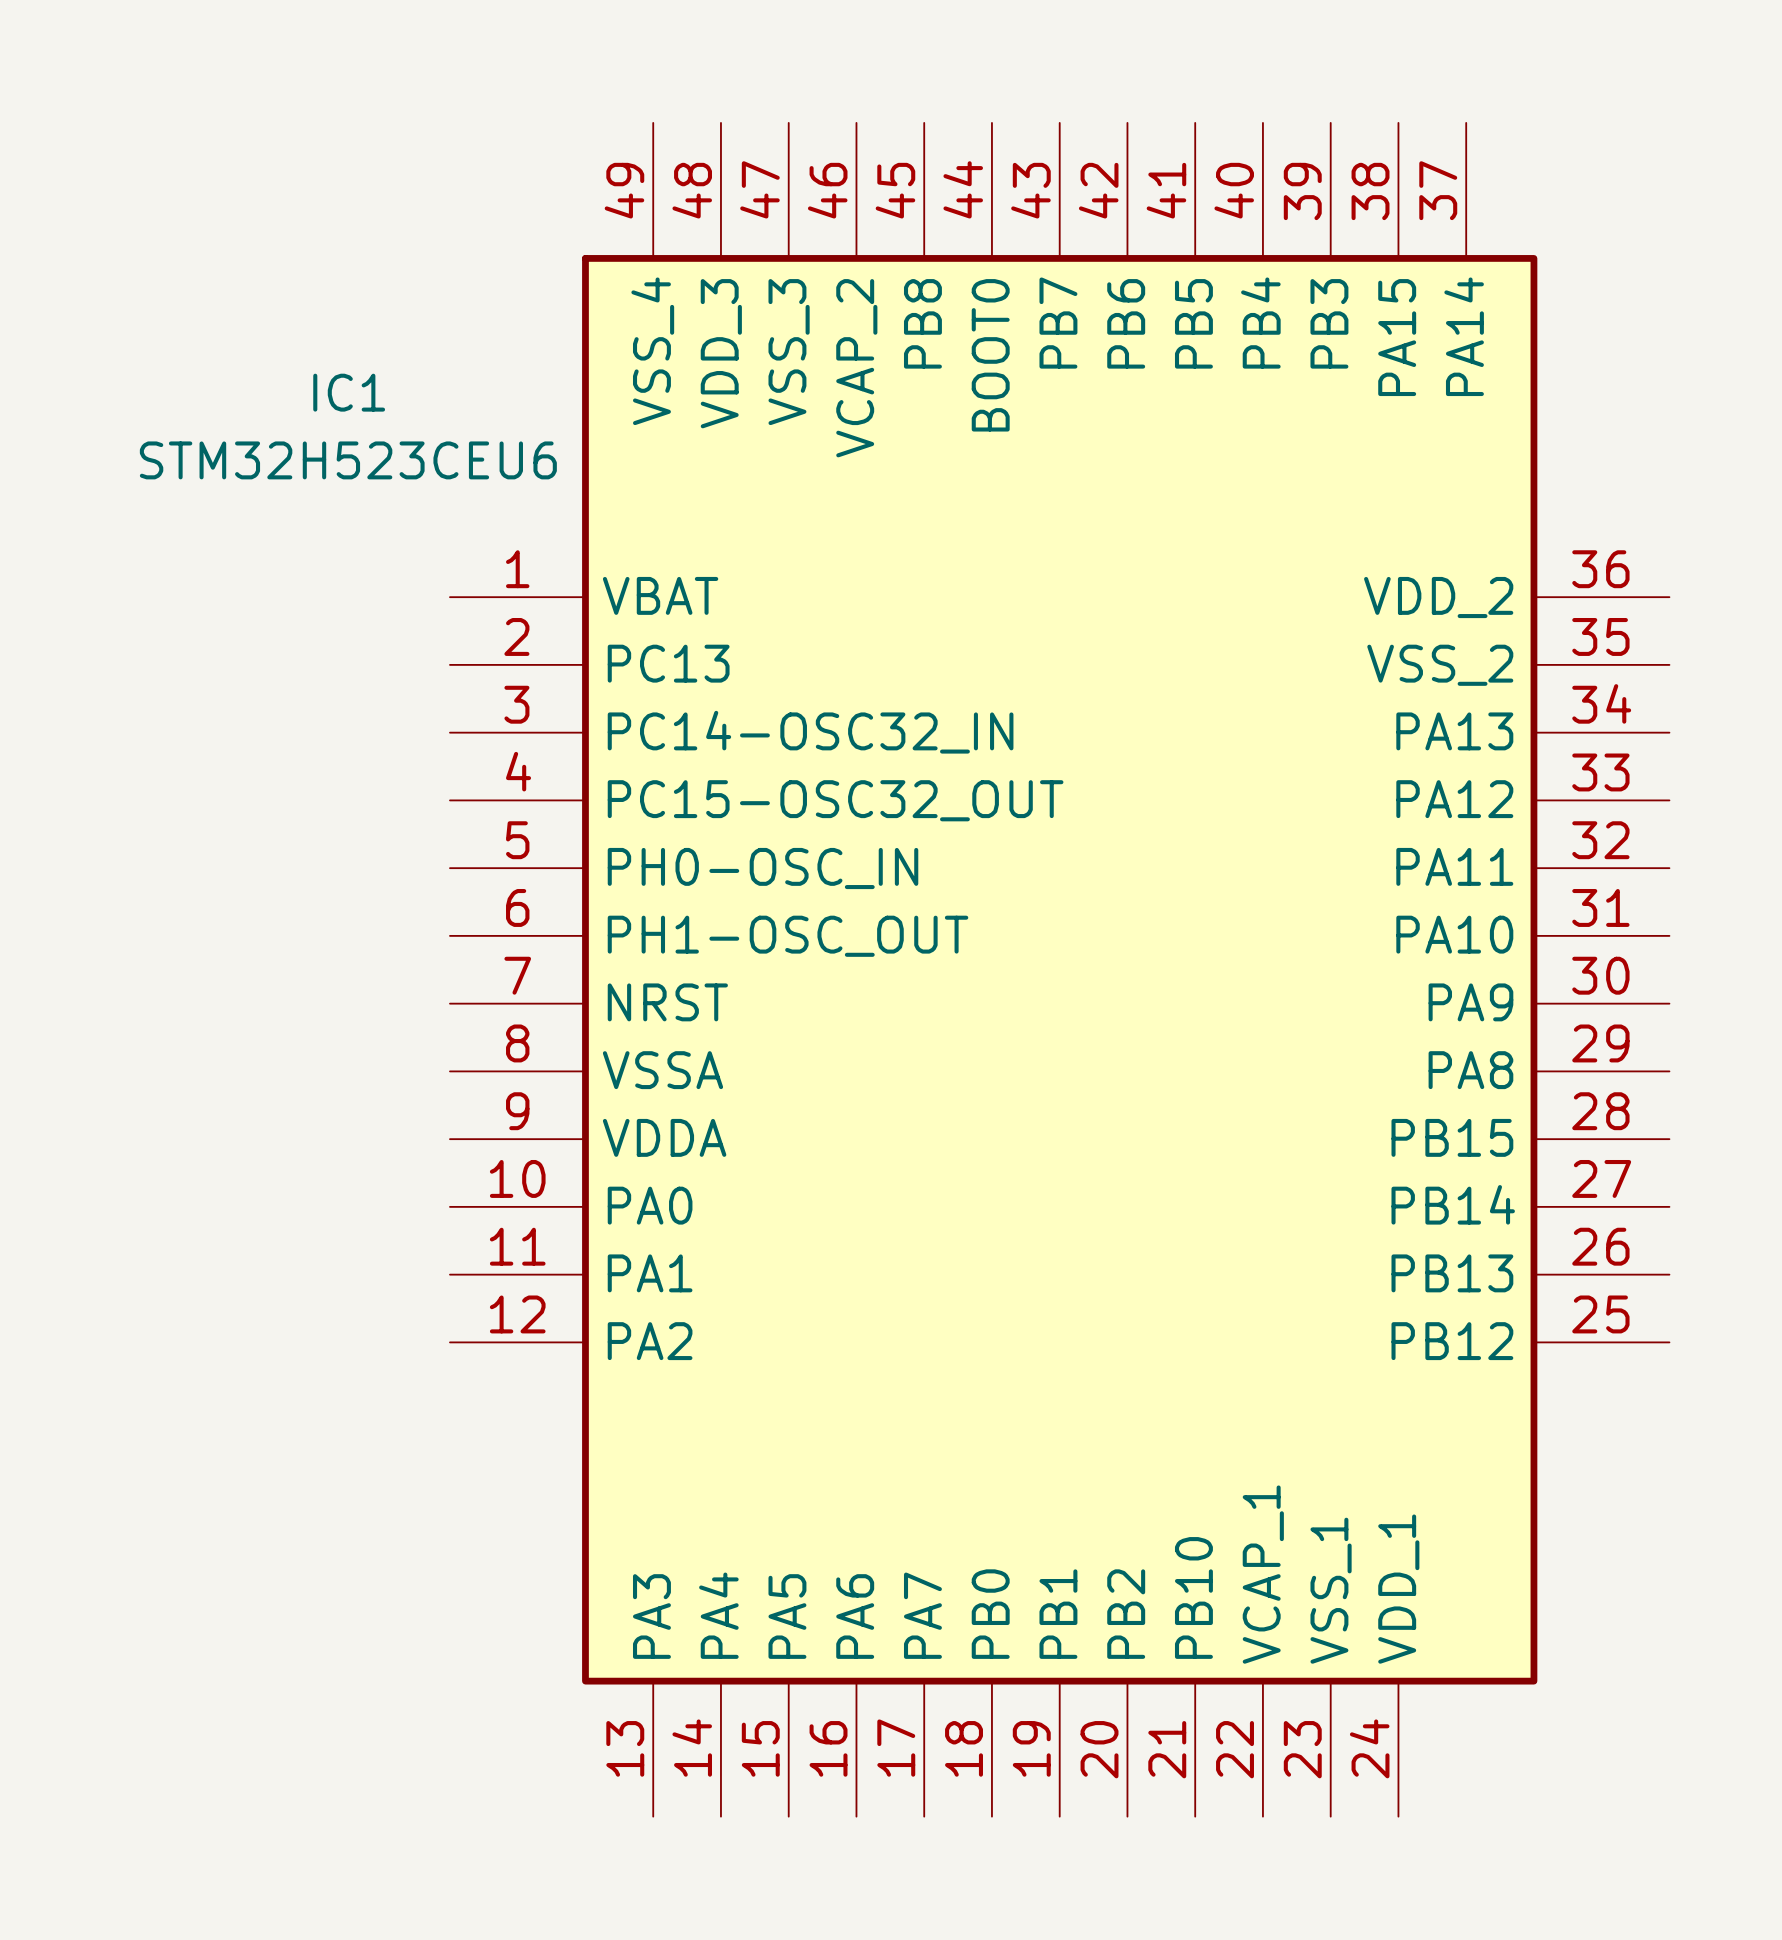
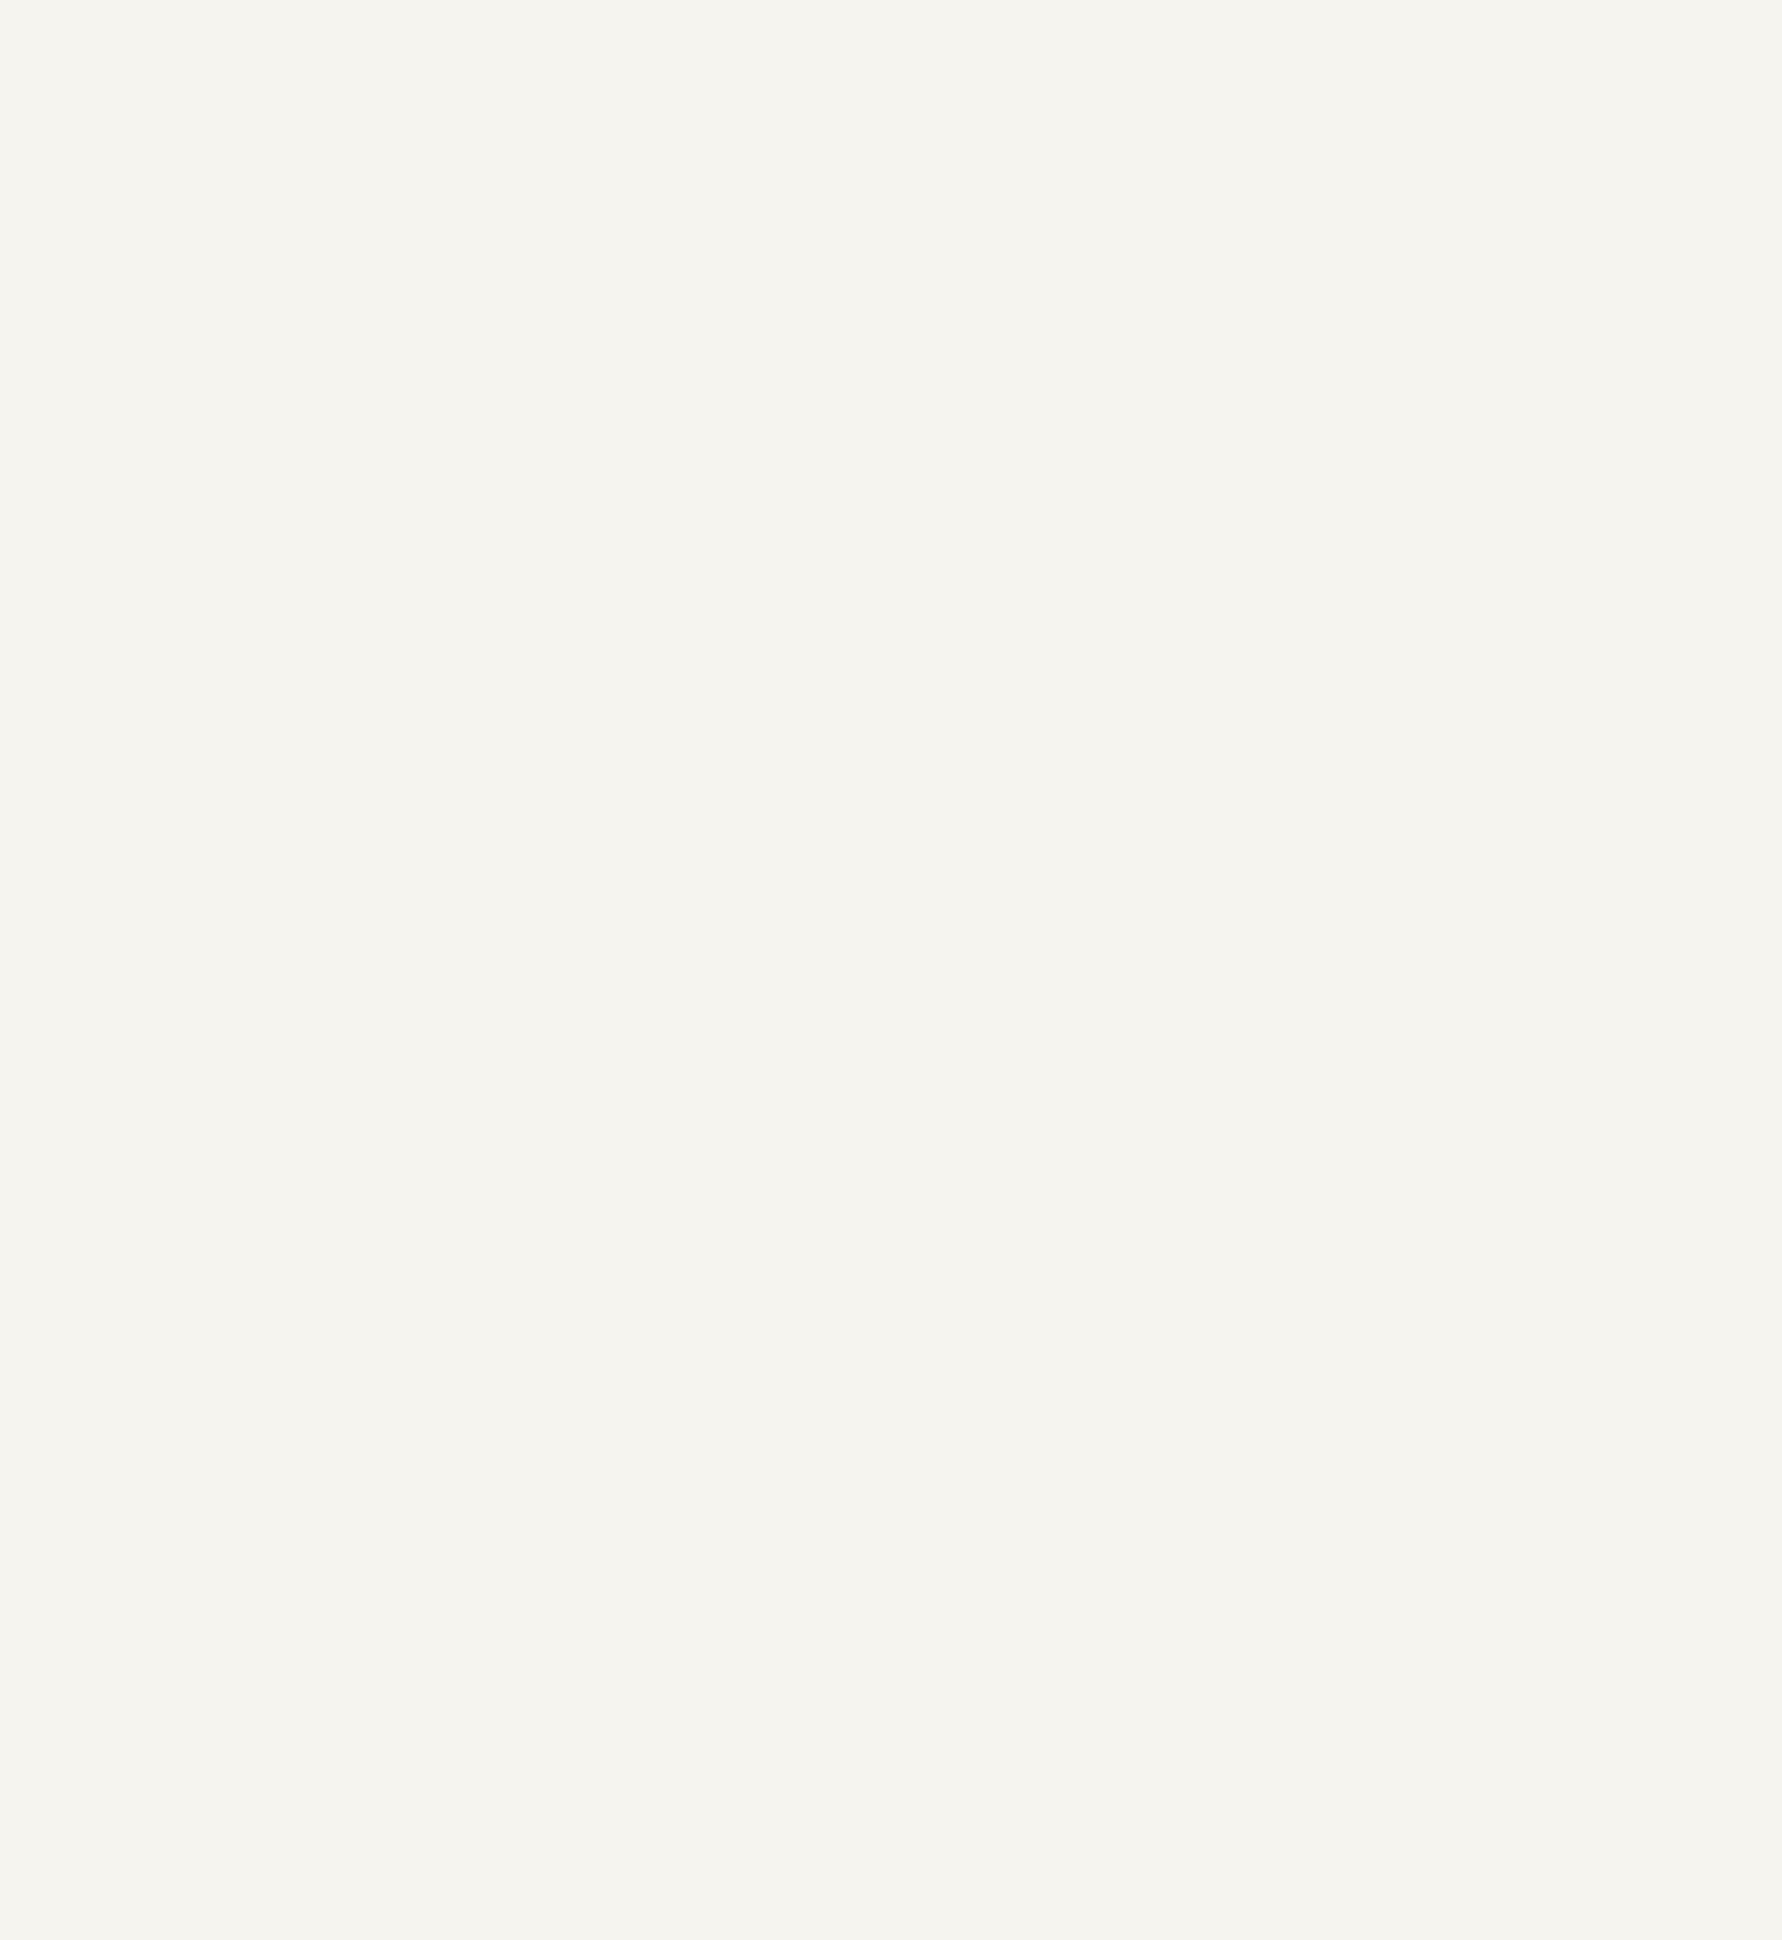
IC1: STM32H523CEU6 (1059, 969) -> none

